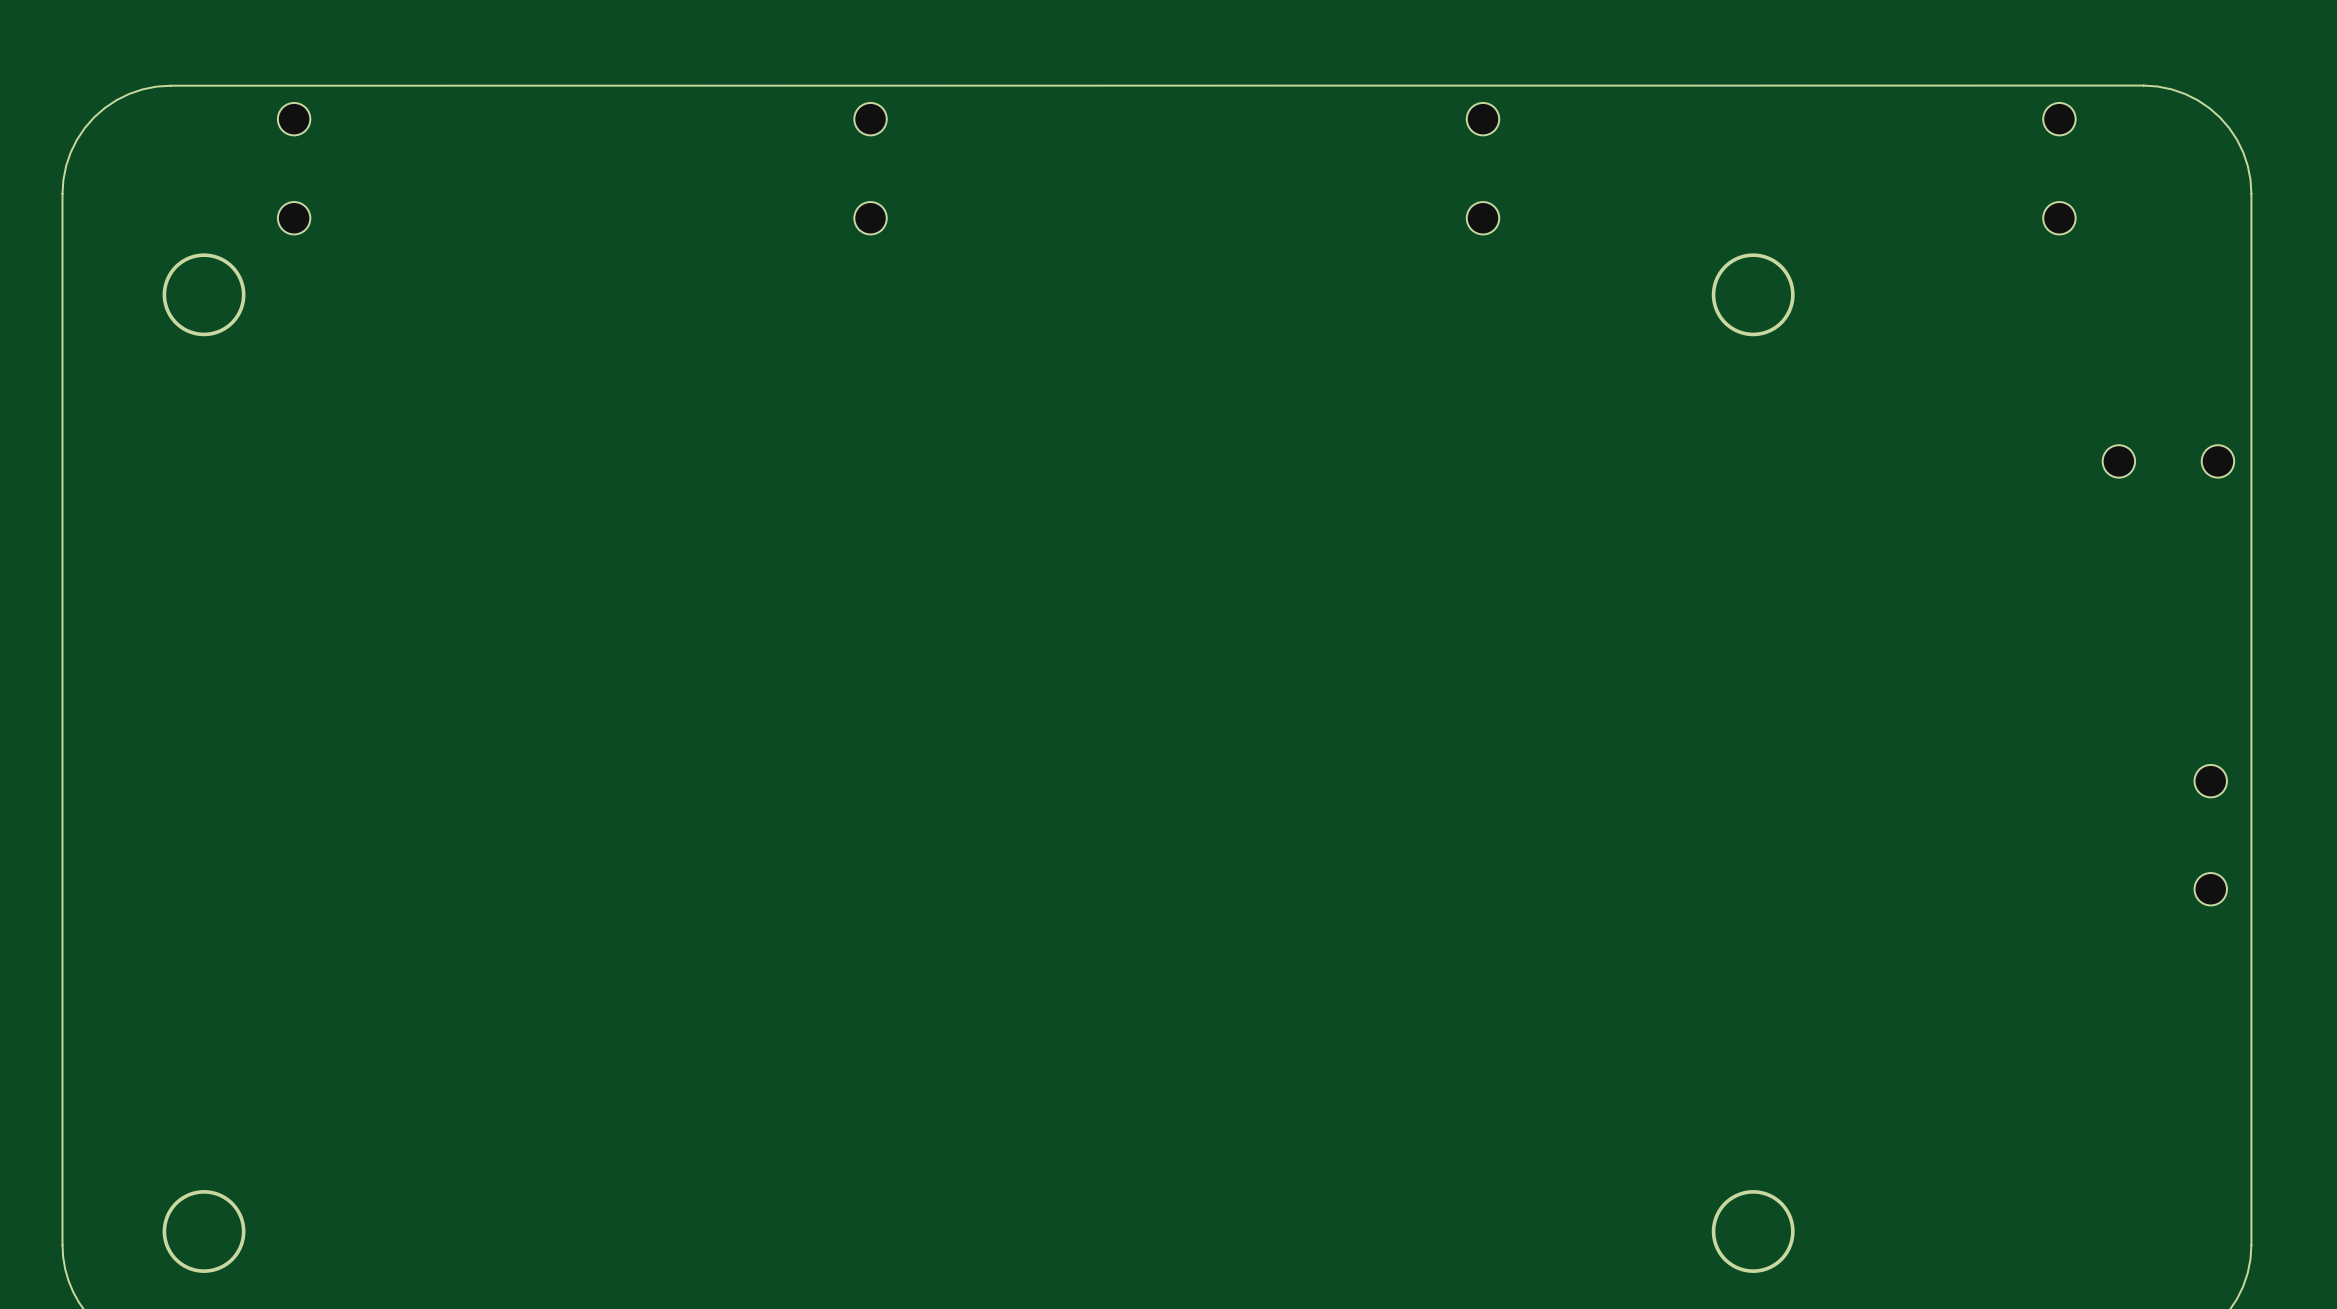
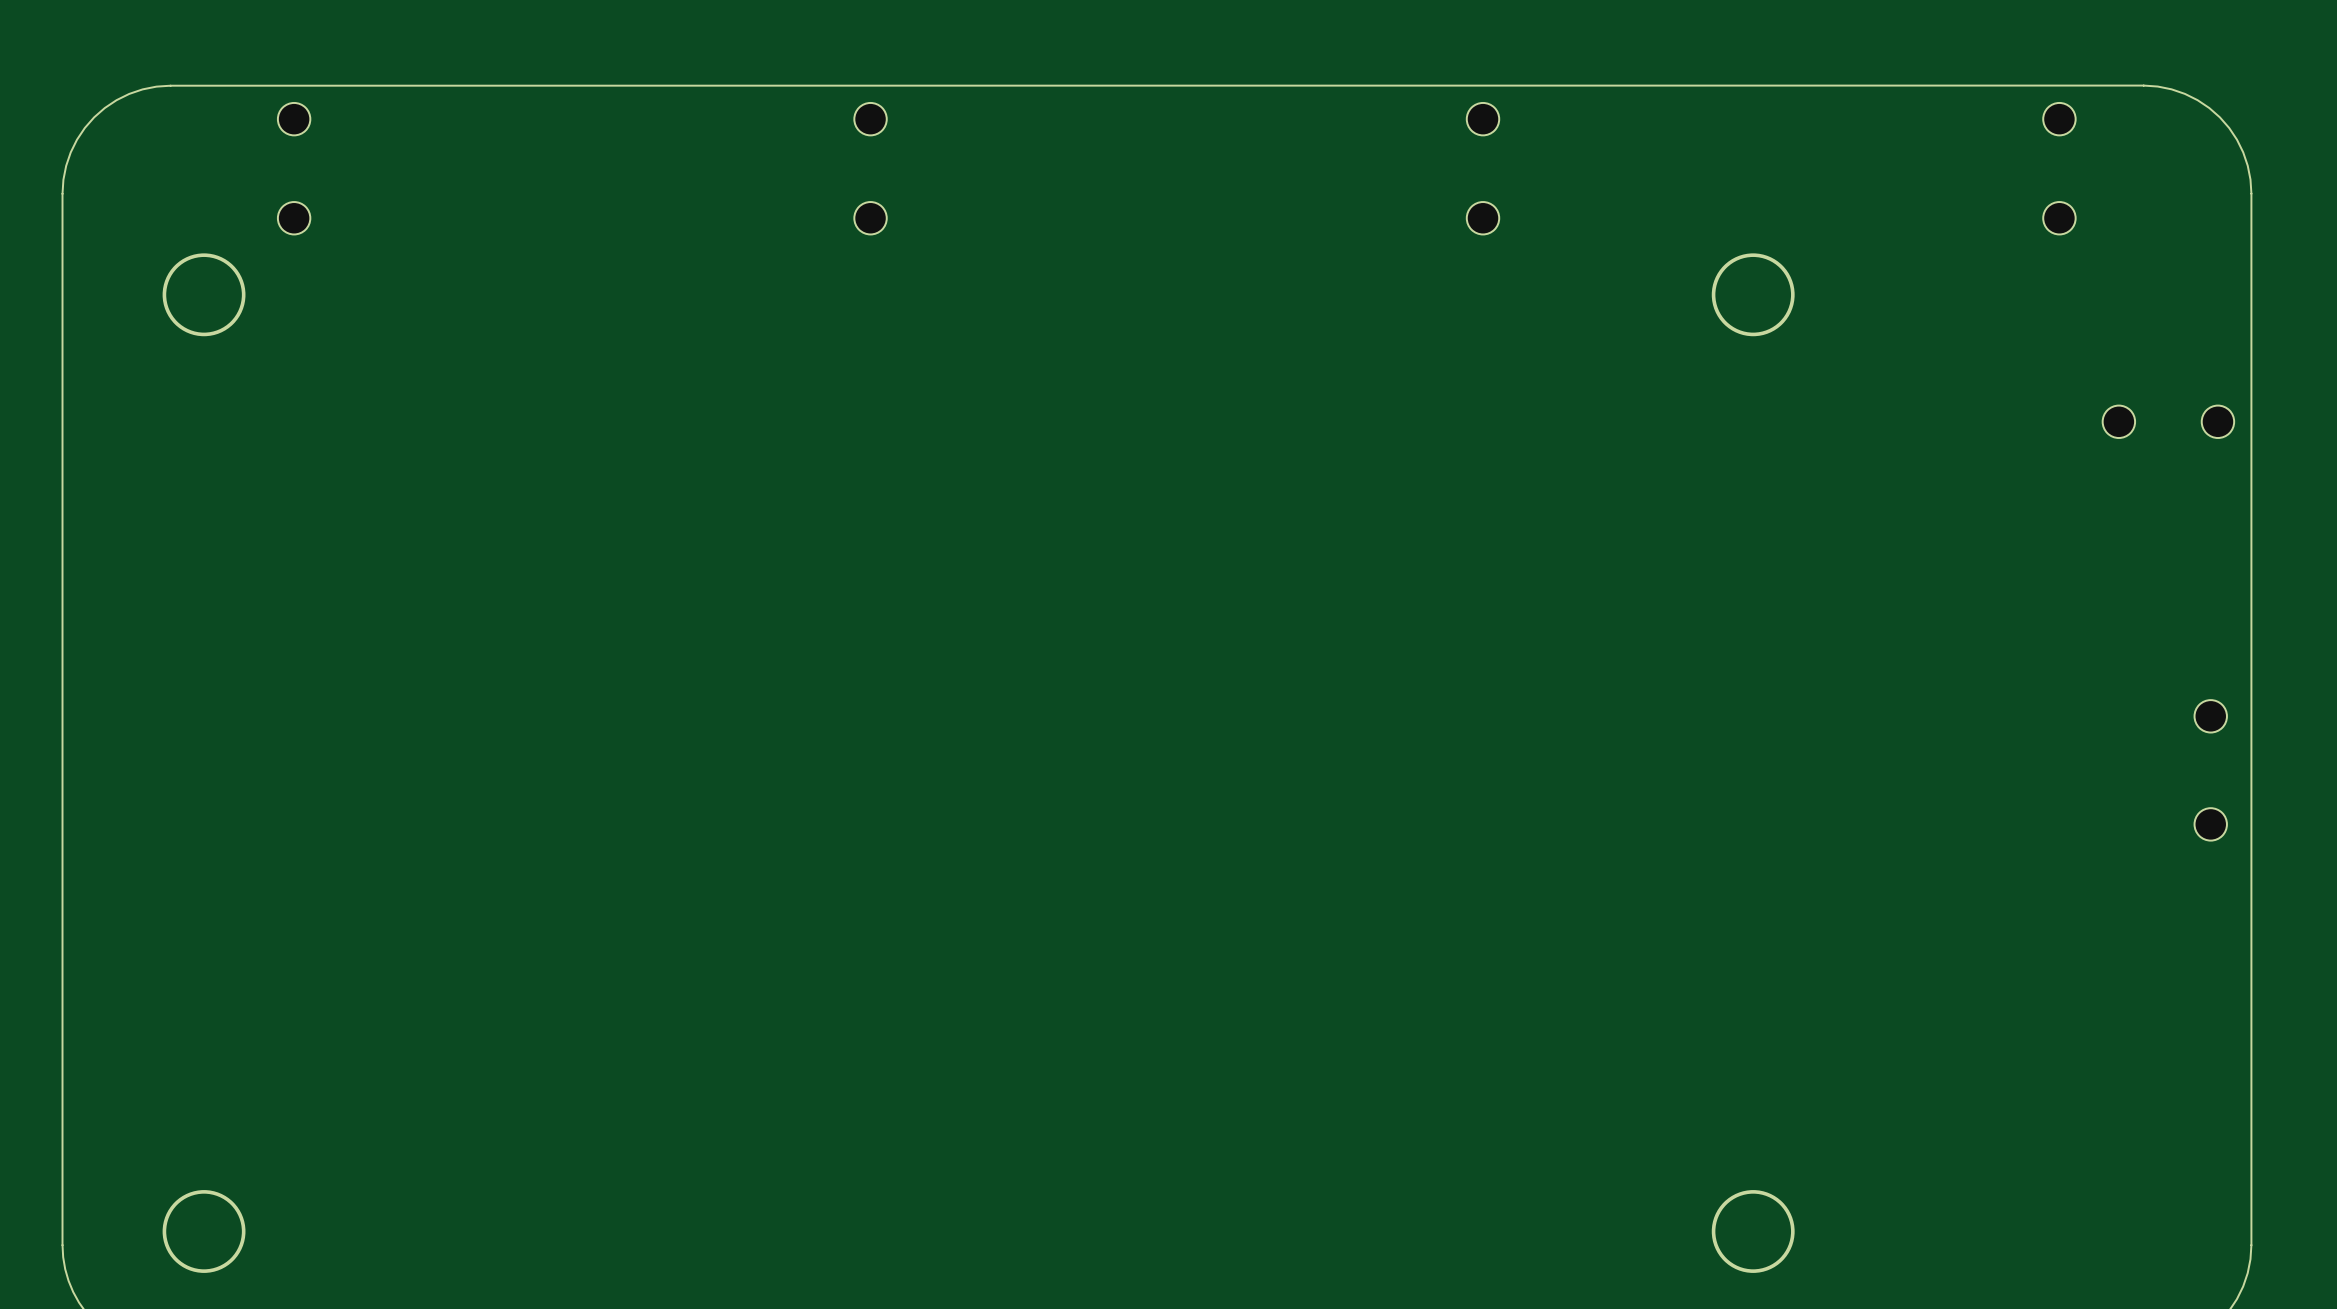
part position: (2168, 461) -> (2168, 421)
part position: (2210, 835) -> (2210, 770)

